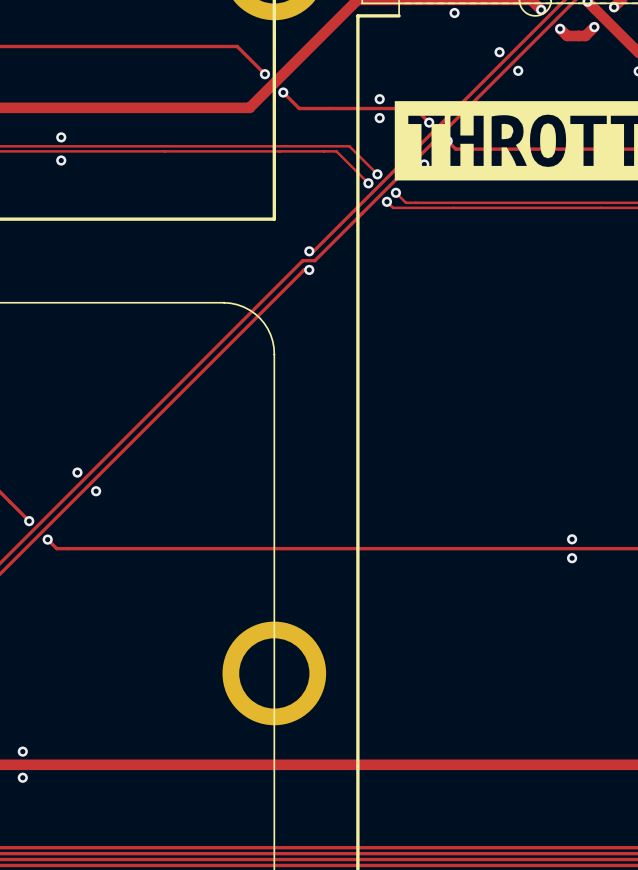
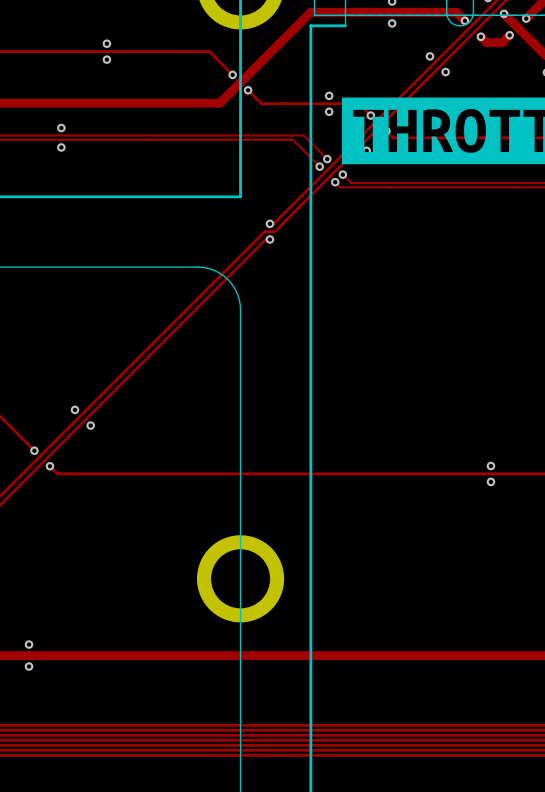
via: none -> (106, 43)
via: none -> (106, 59)

